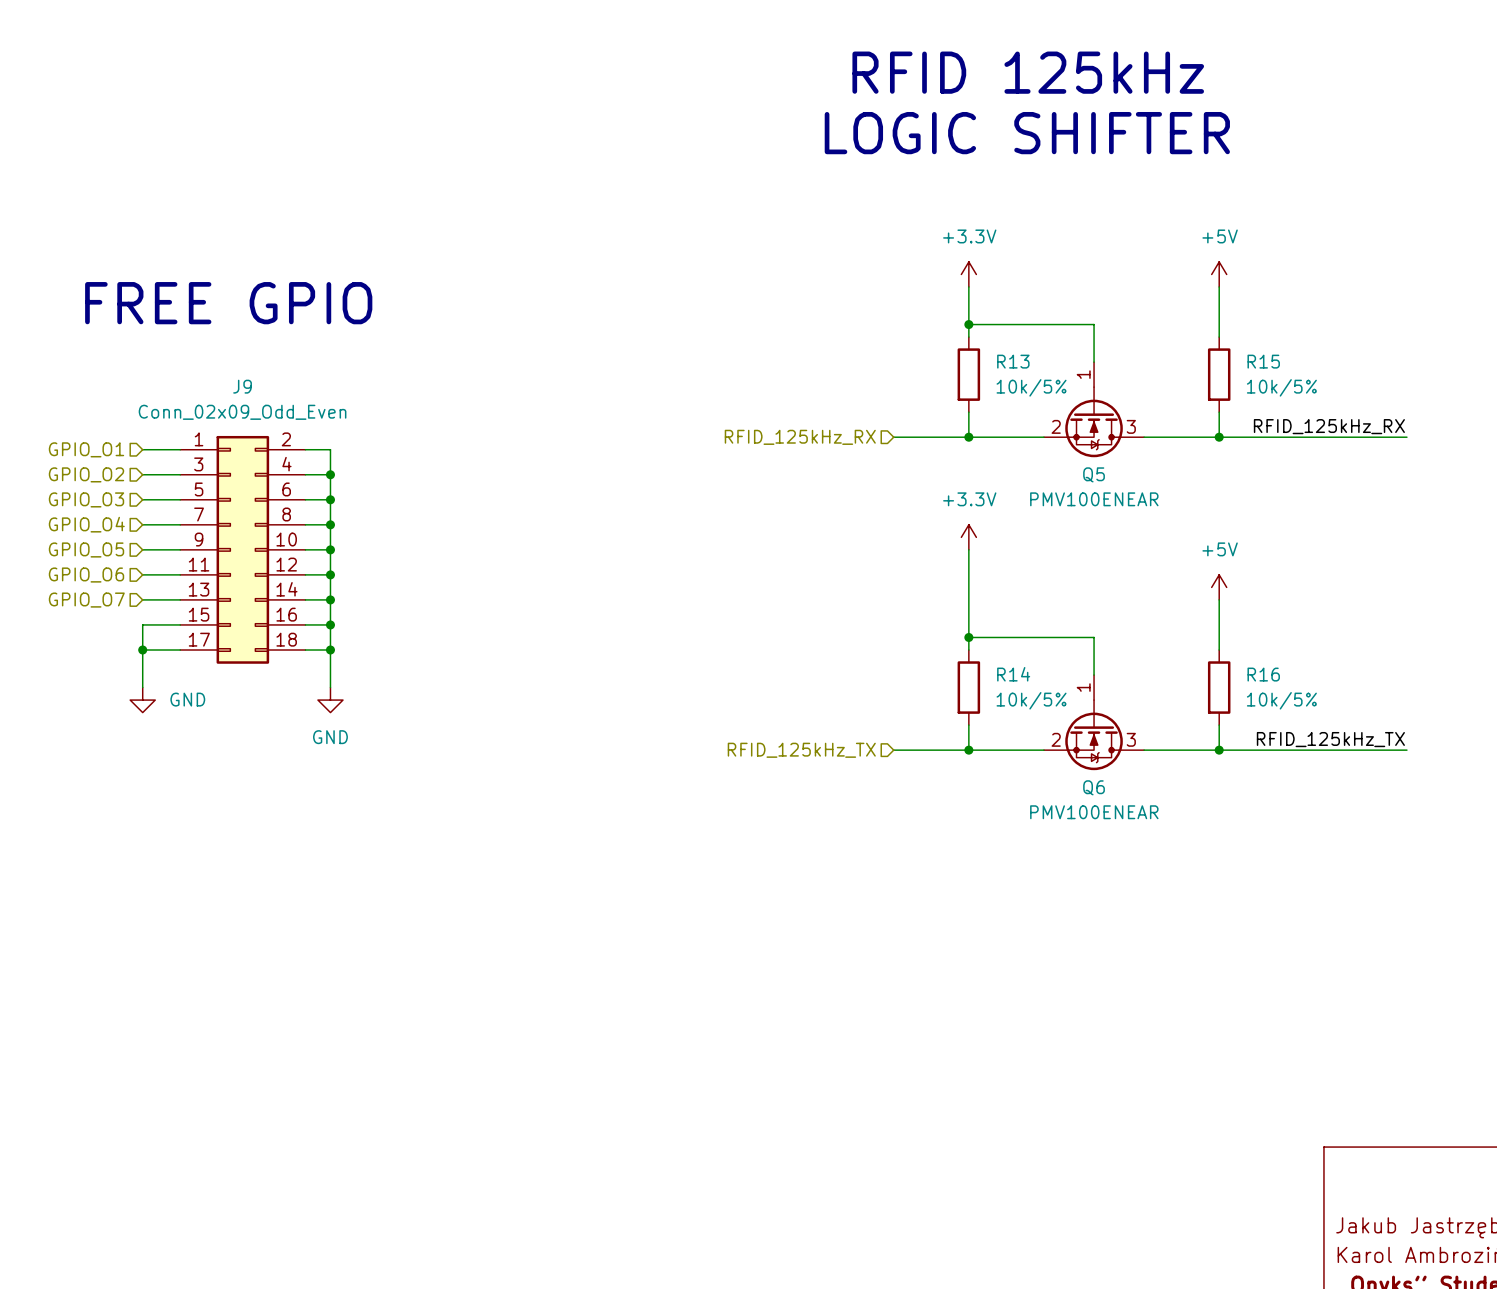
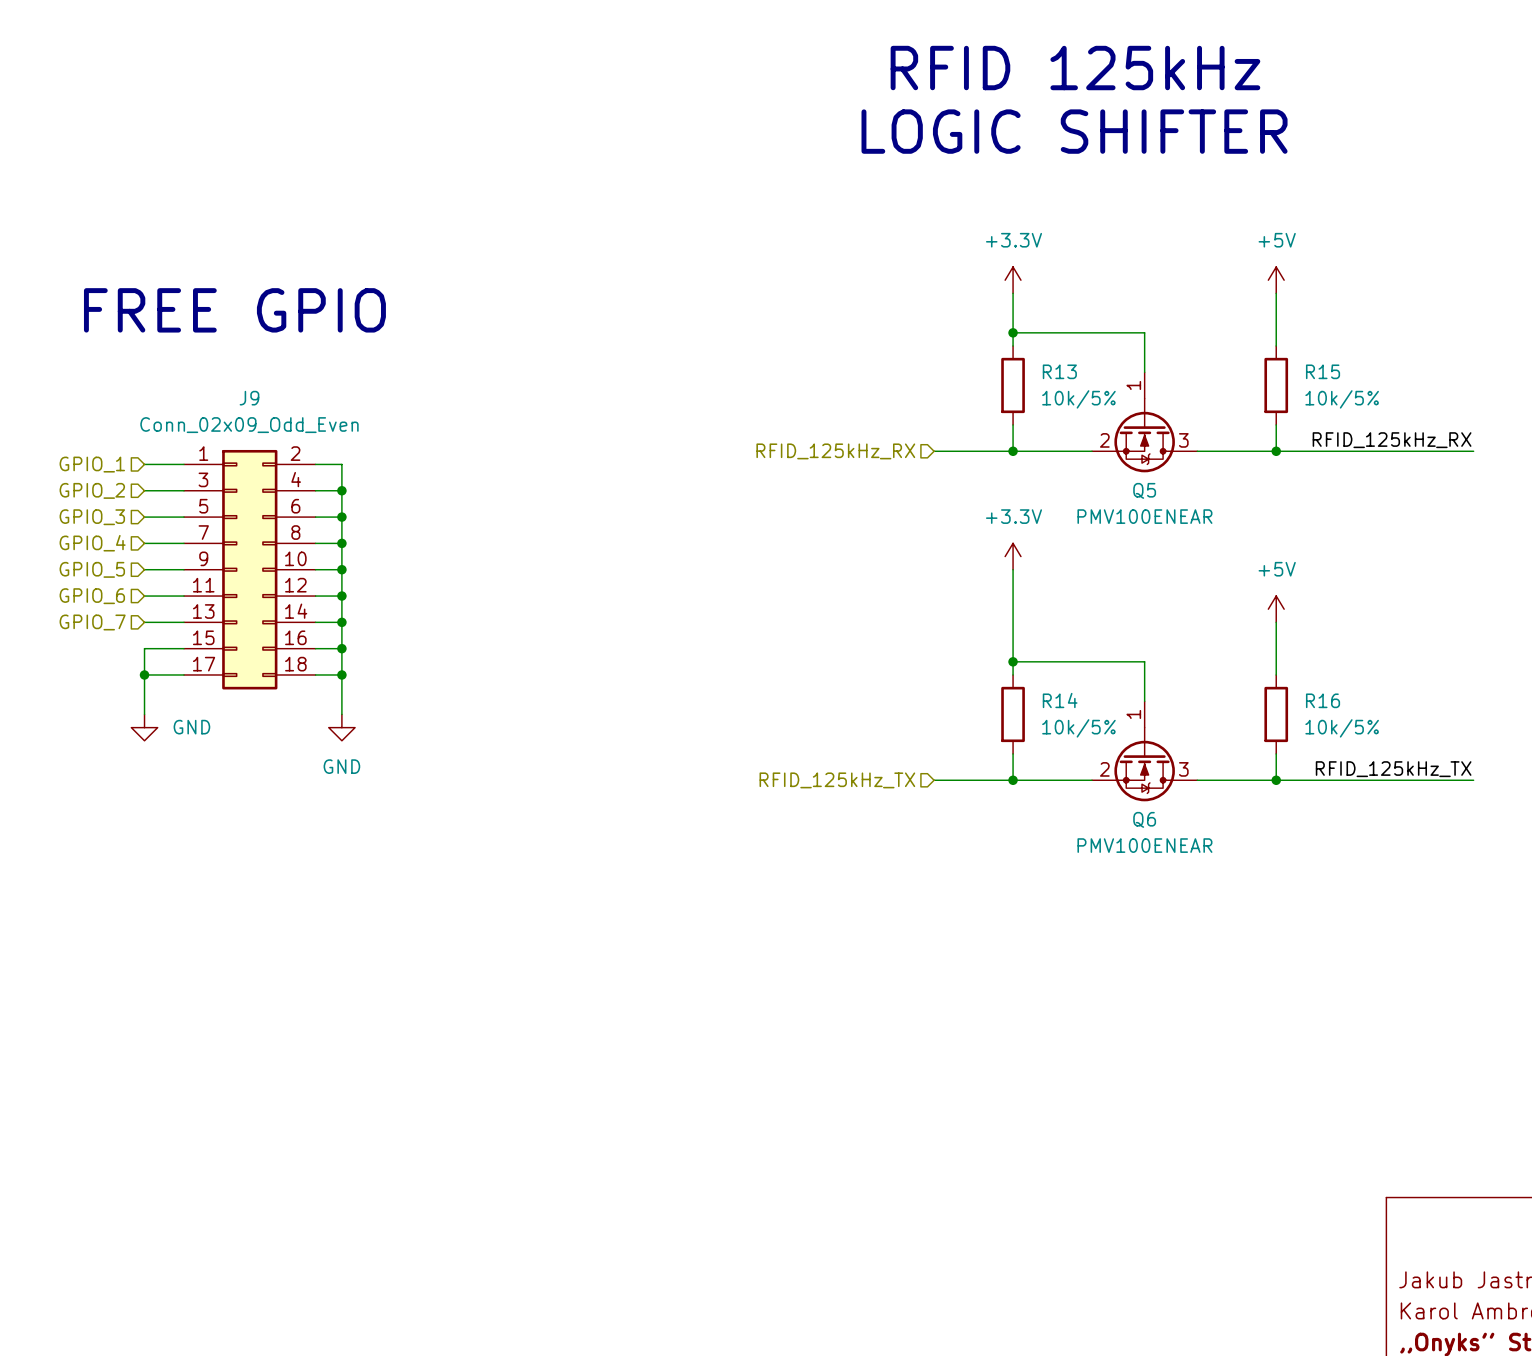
hierarchical label: GPIO_O1 (86, 449) -> GPIO_1 (92, 464)
hierarchical label: GPIO_O2 (86, 474) -> GPIO_2 (92, 490)
hierarchical label: GPIO_O3 (86, 499) -> GPIO_3 (92, 517)
hierarchical label: GPIO_O4 (86, 524) -> GPIO_4 (92, 543)
hierarchical label: GPIO_O5 (86, 549) -> GPIO_5 (92, 569)
hierarchical label: GPIO_O6 (86, 575) -> GPIO_6 (92, 596)
hierarchical label: GPIO_O7 (86, 600) -> GPIO_7 (92, 622)

